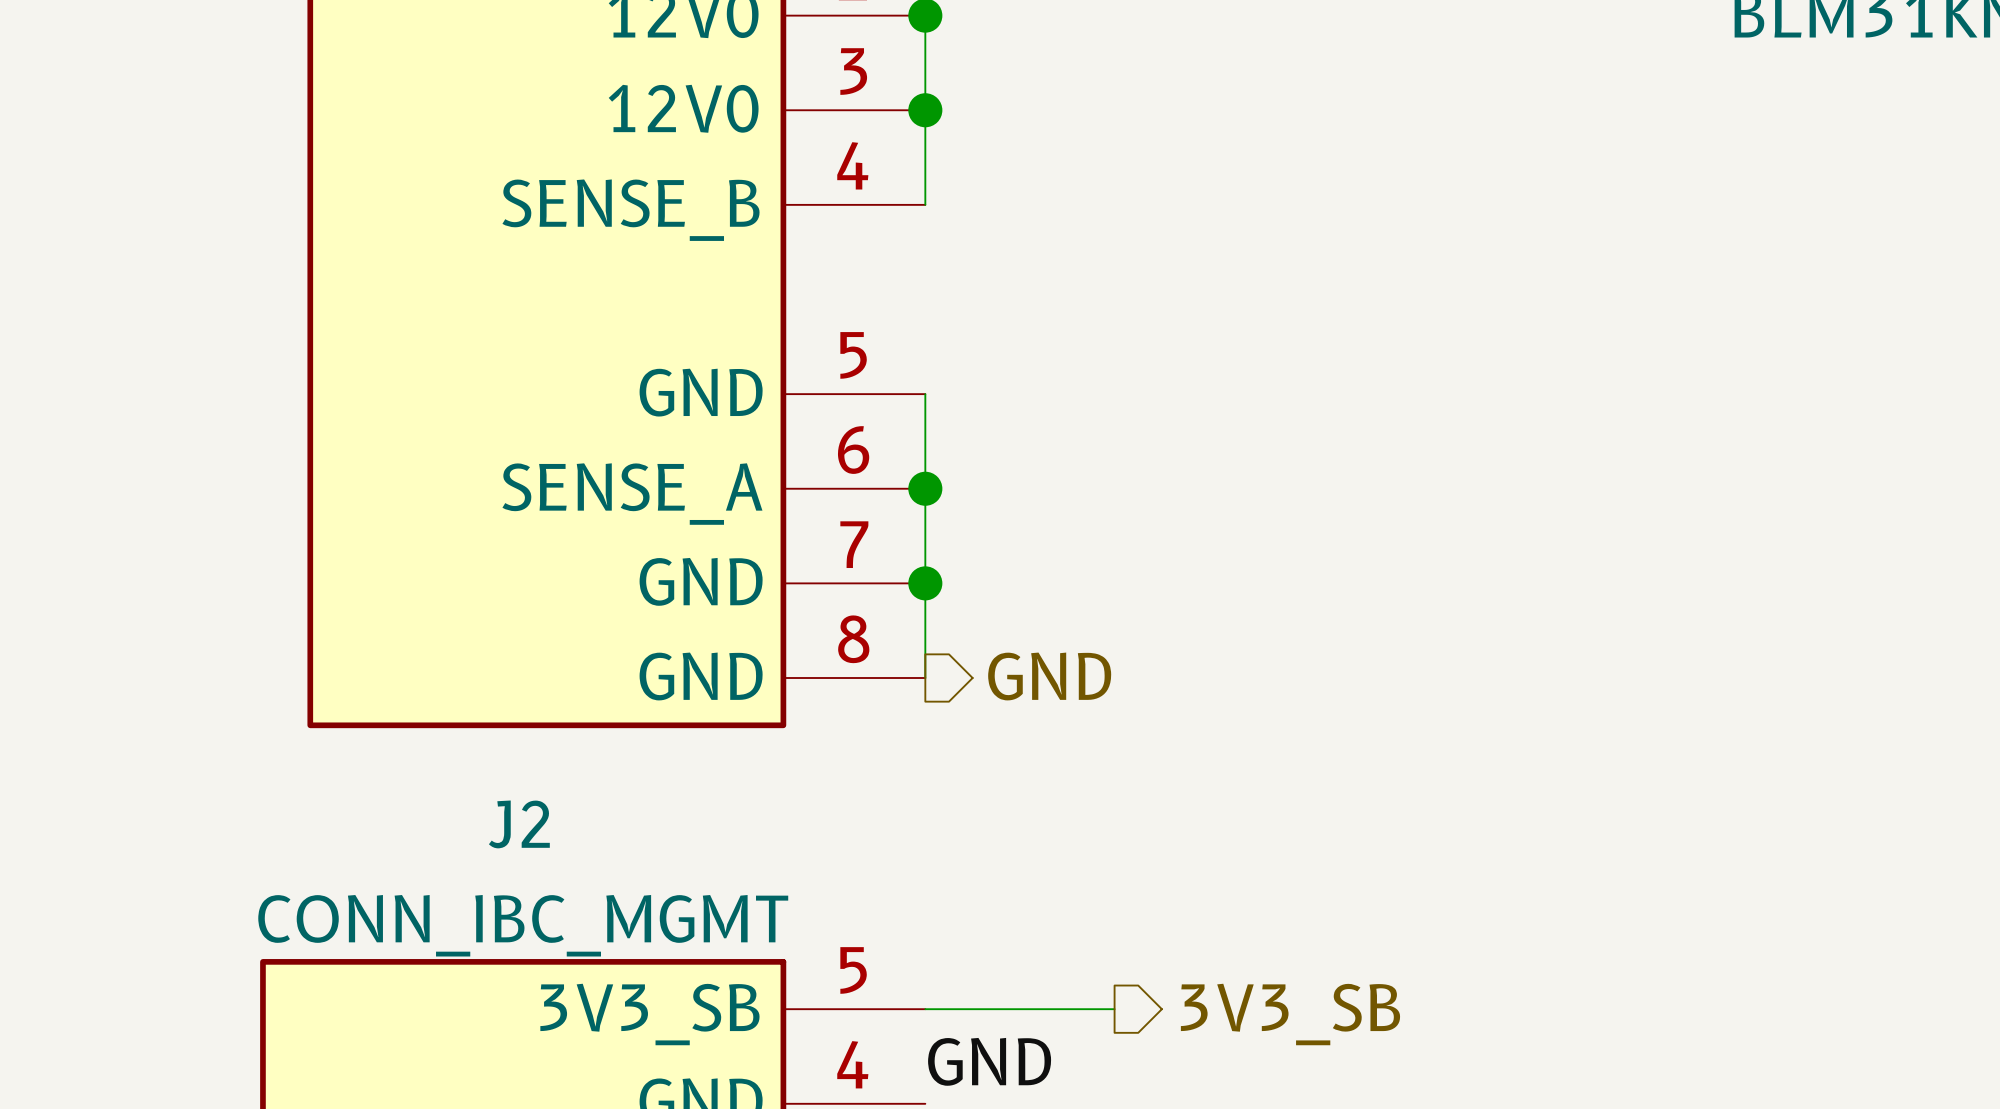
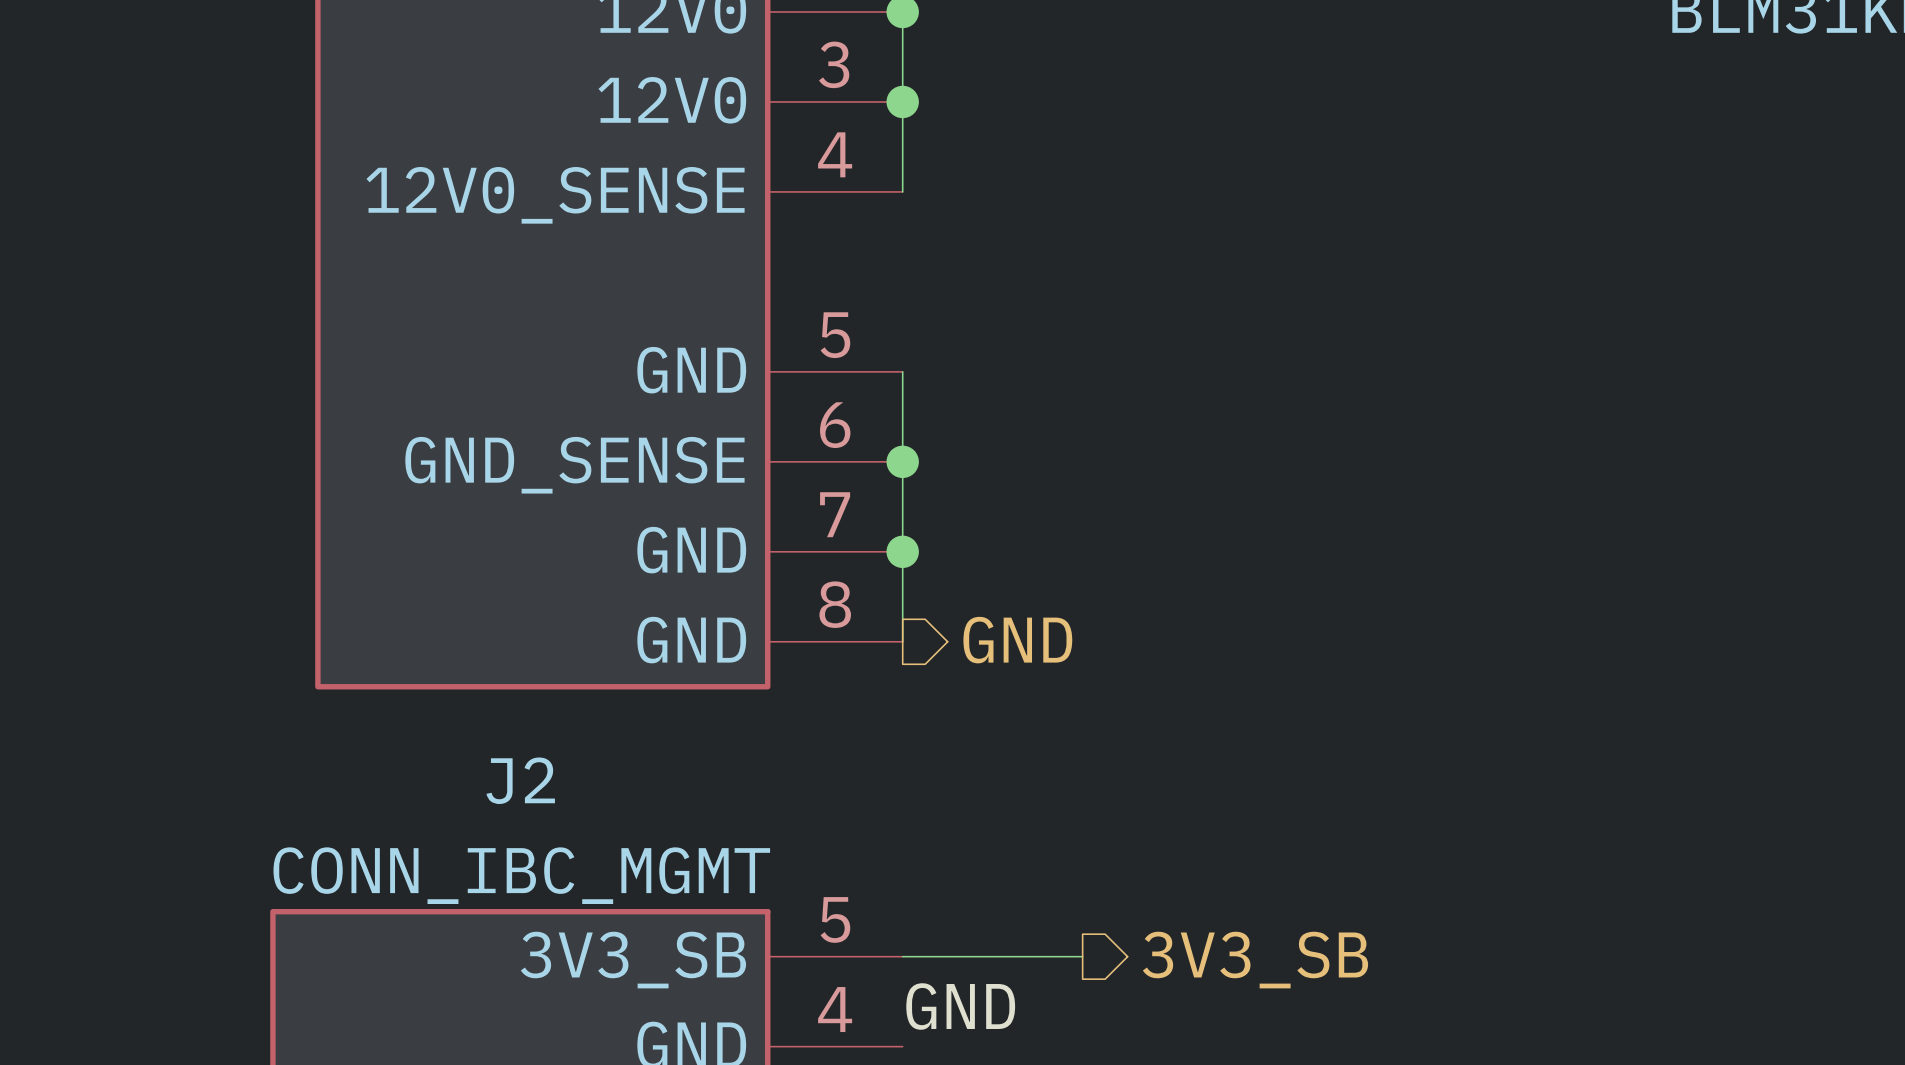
part pin name: SENSE_B (630, 210) -> 12V0_SENSE (555, 195)
part pin name: SENSE_A (632, 494) -> GND_SENSE (574, 465)

